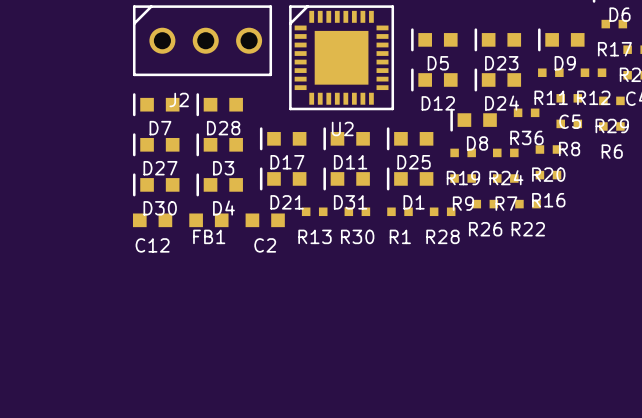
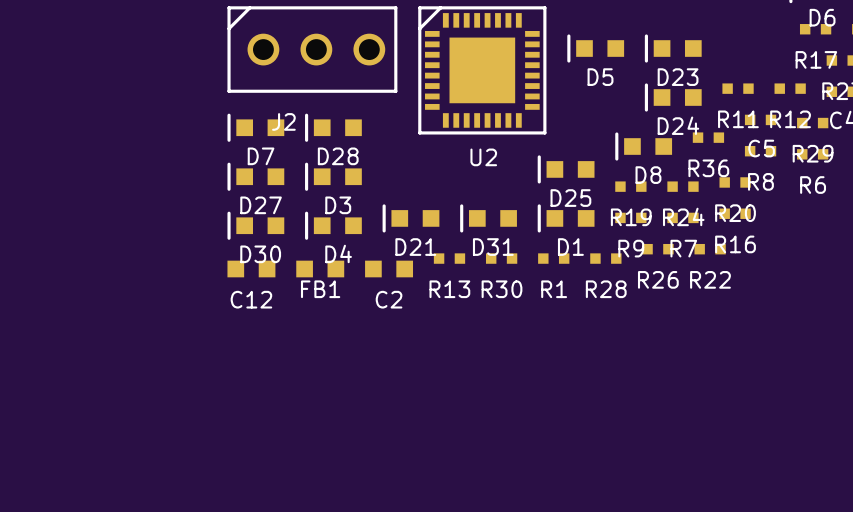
D9: (561, 39) -> none
D12: (434, 79) -> none
D17: (283, 138) -> none
D11: (346, 138) -> none

